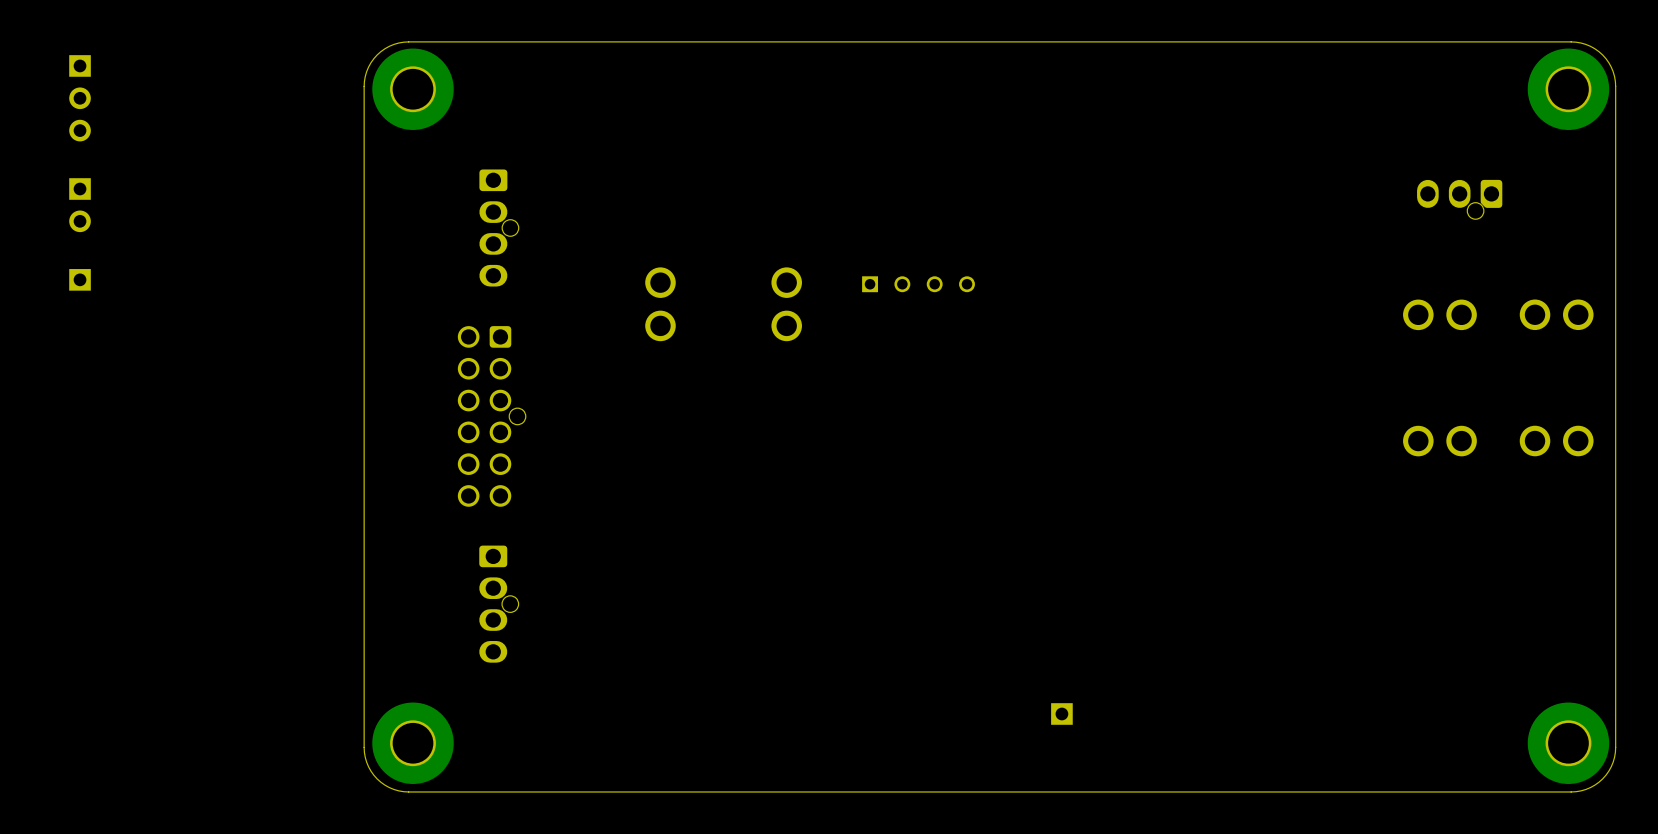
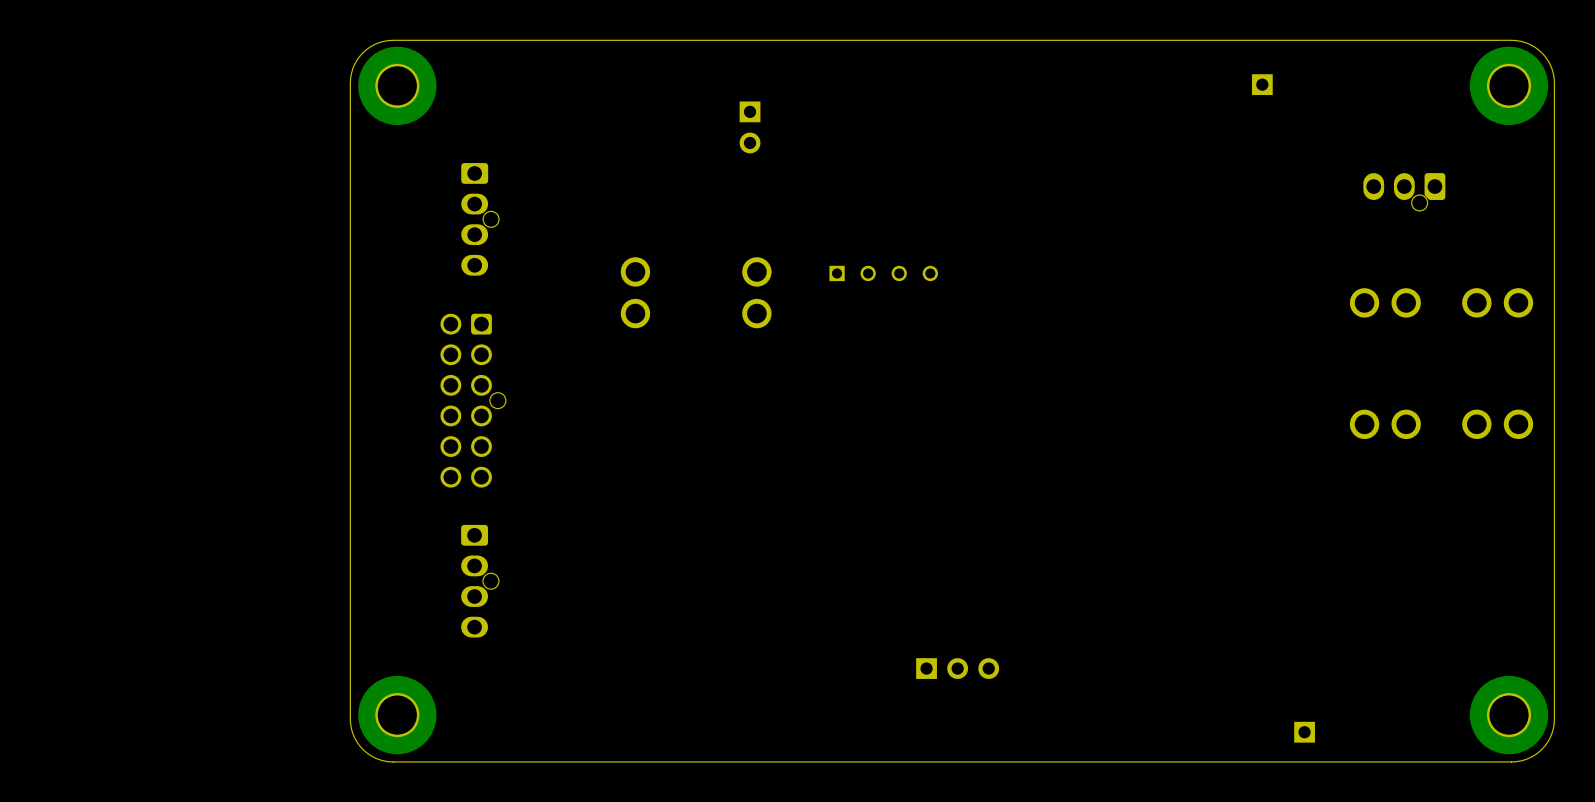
part: none -> (1262, 84)
part: (80, 98) -> none
part: none -> (750, 127)
part: (80, 205) -> none
part: (80, 279) -> none
part: none -> (957, 668)
part position: (1061, 713) -> (1304, 732)

